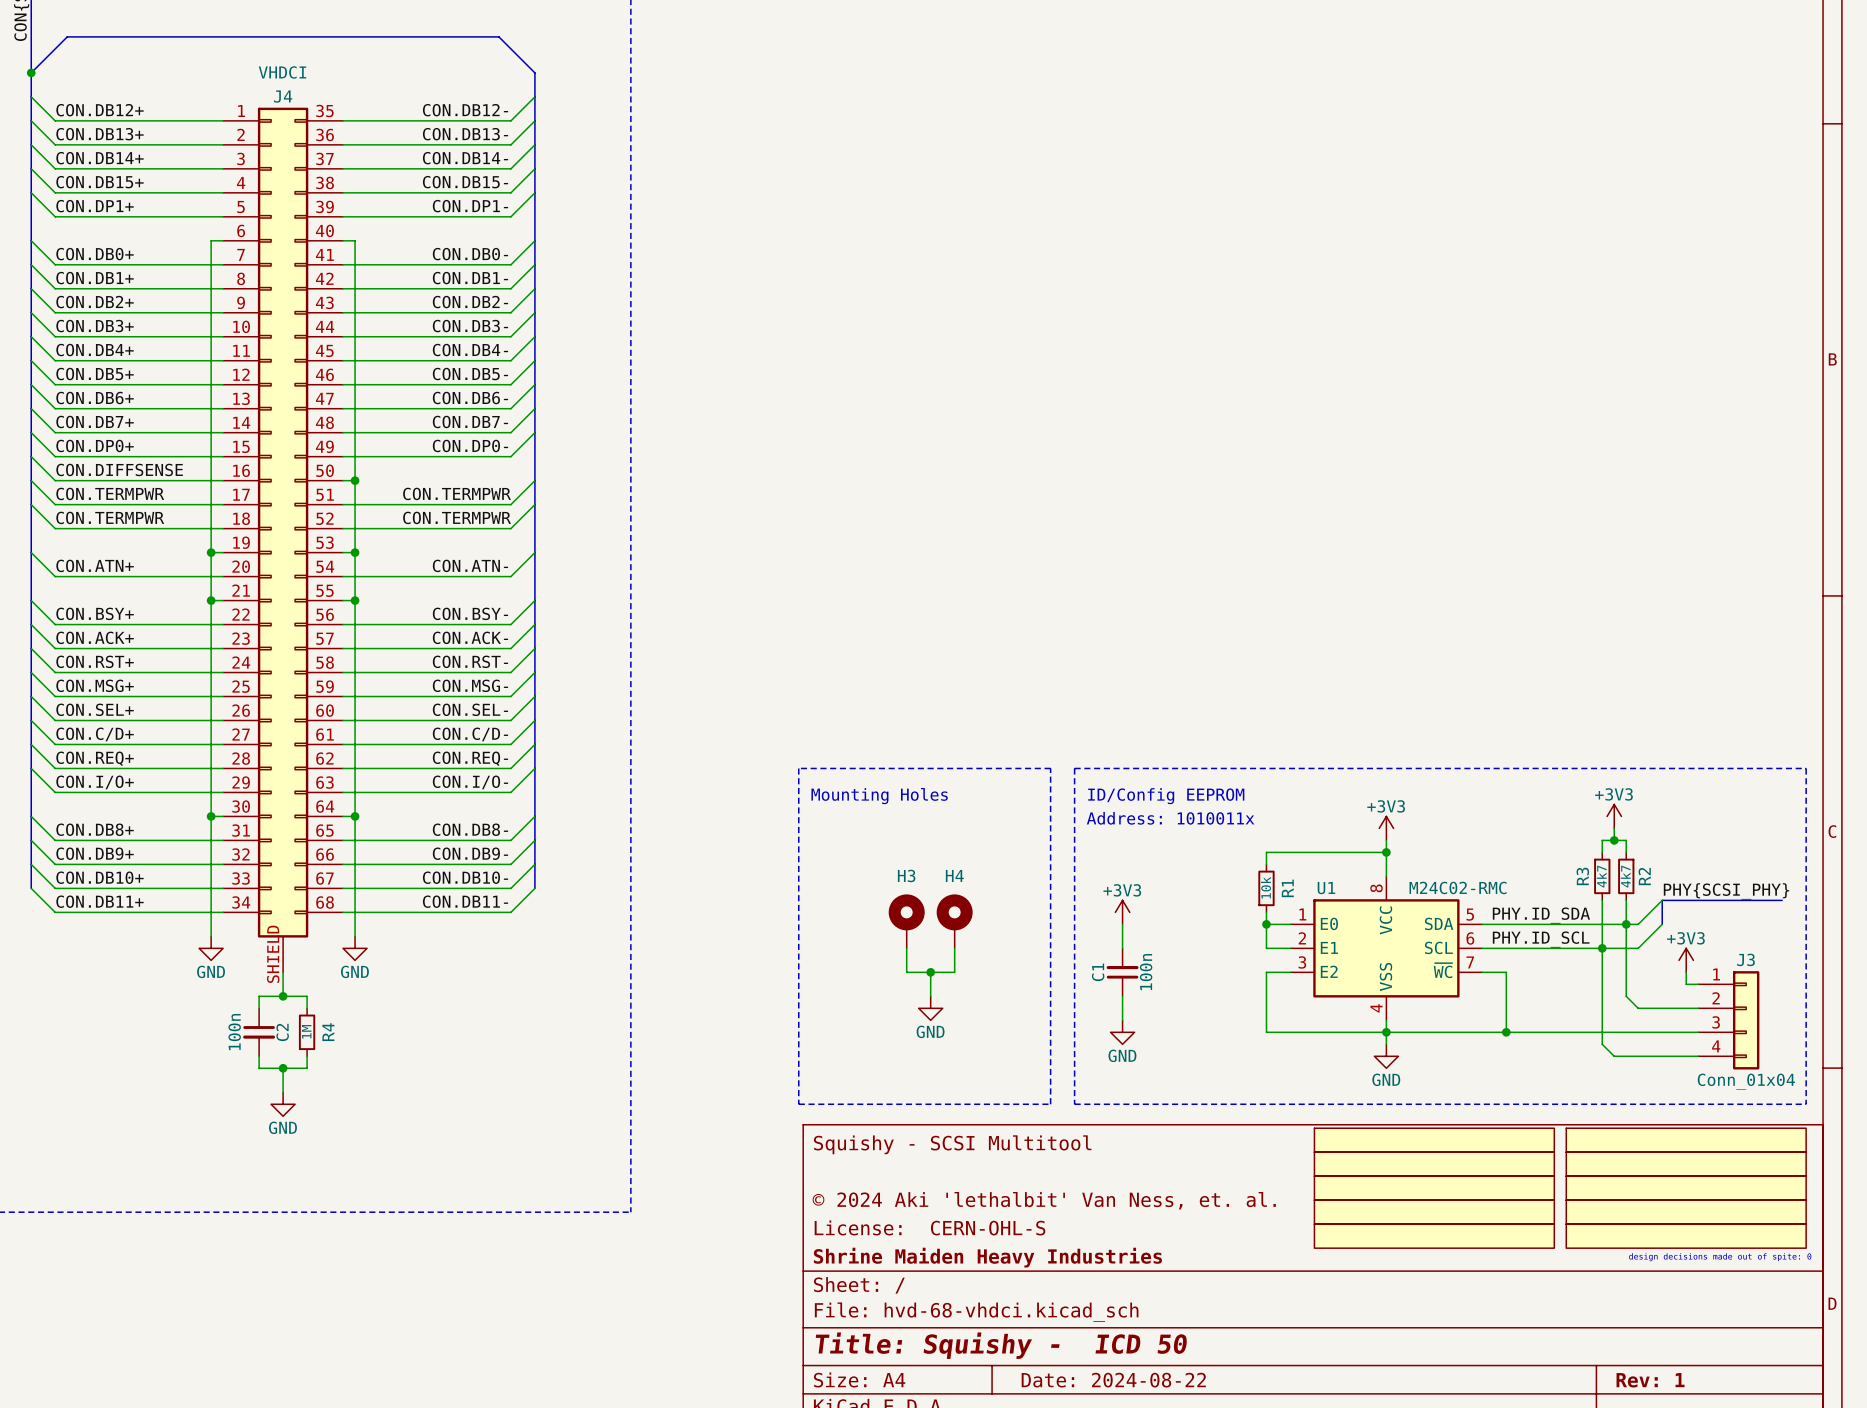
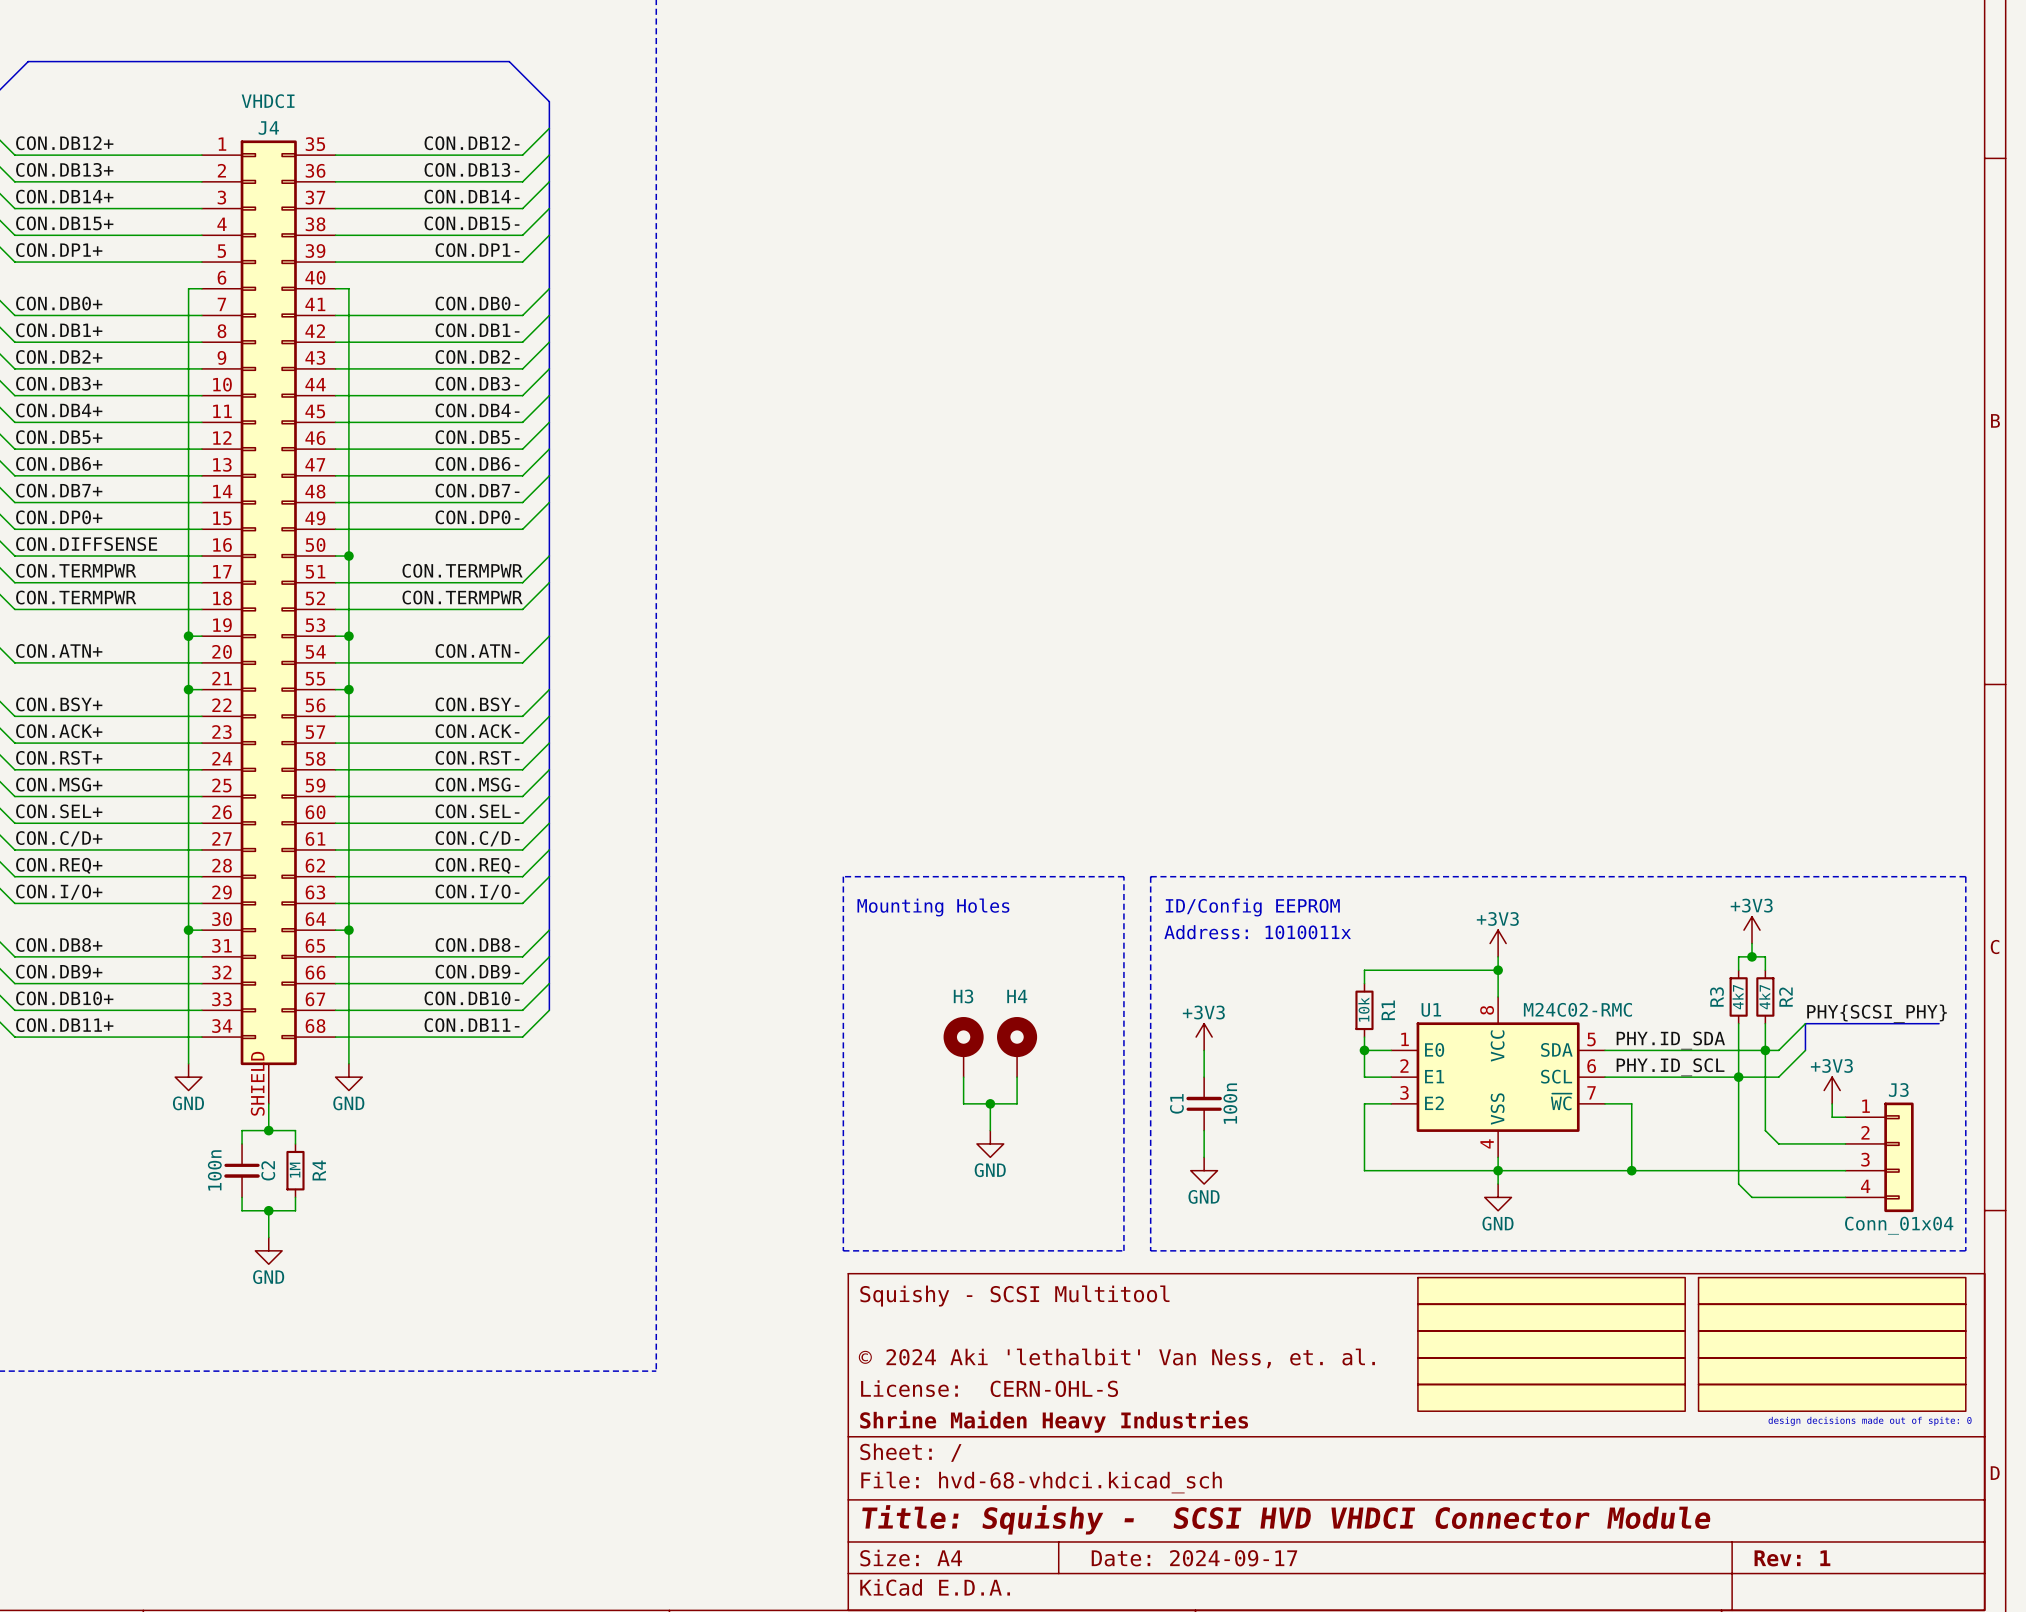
title block: Title: Squishy - ICD 50 (1001, 1345) -> Title: Squishy - SCSI HVD VHDCI Connector Module (1286, 1519)
title block: Date: 2024-08-22 (1113, 1380) -> Date: 2024-09-17 (1194, 1558)

